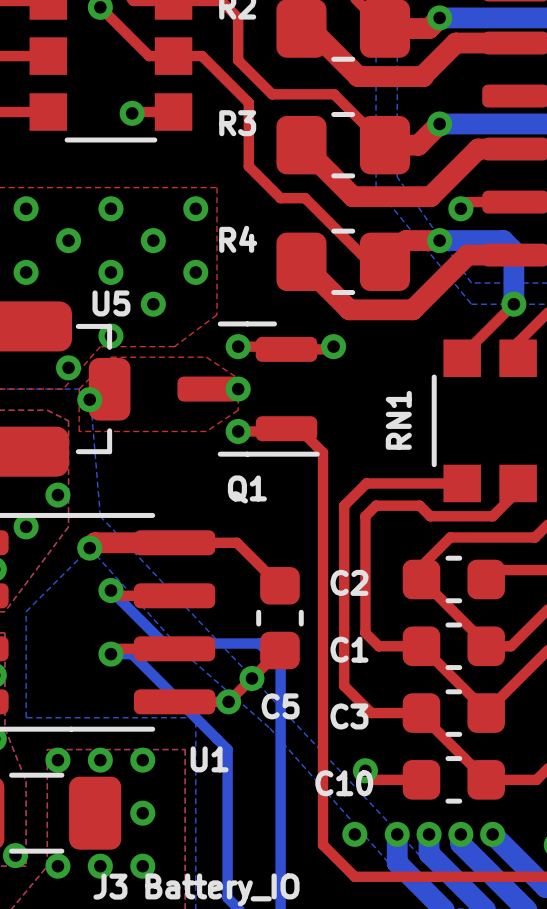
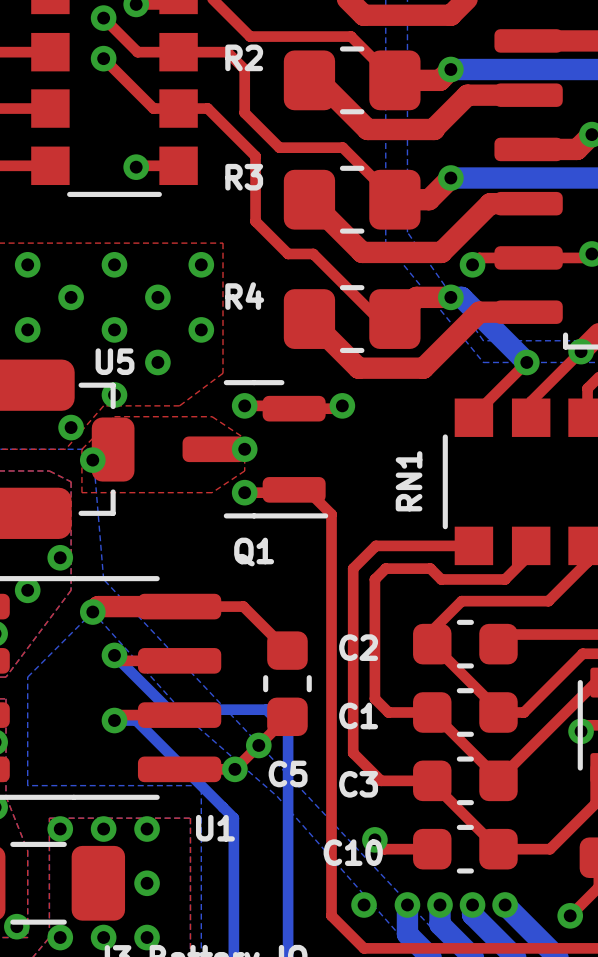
bottom track: (450, 240) (503, 240) (513, 251) (513, 304) -> (461, 297) (526, 362)

